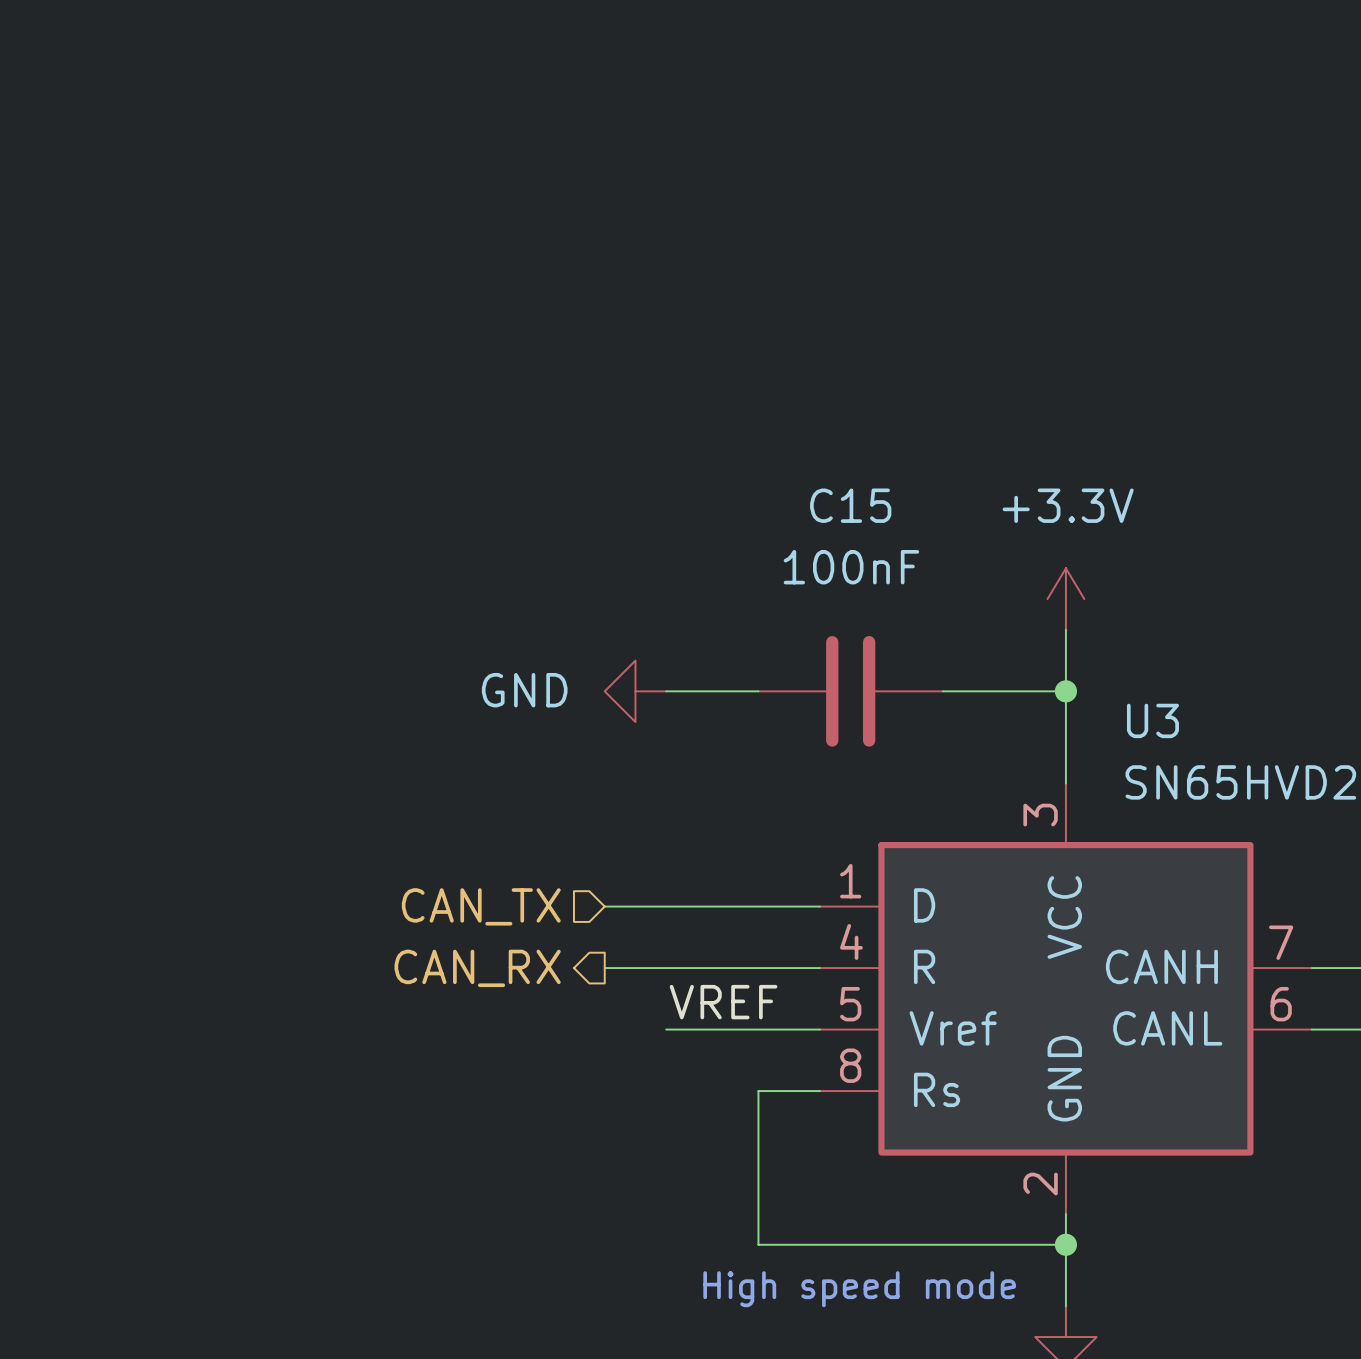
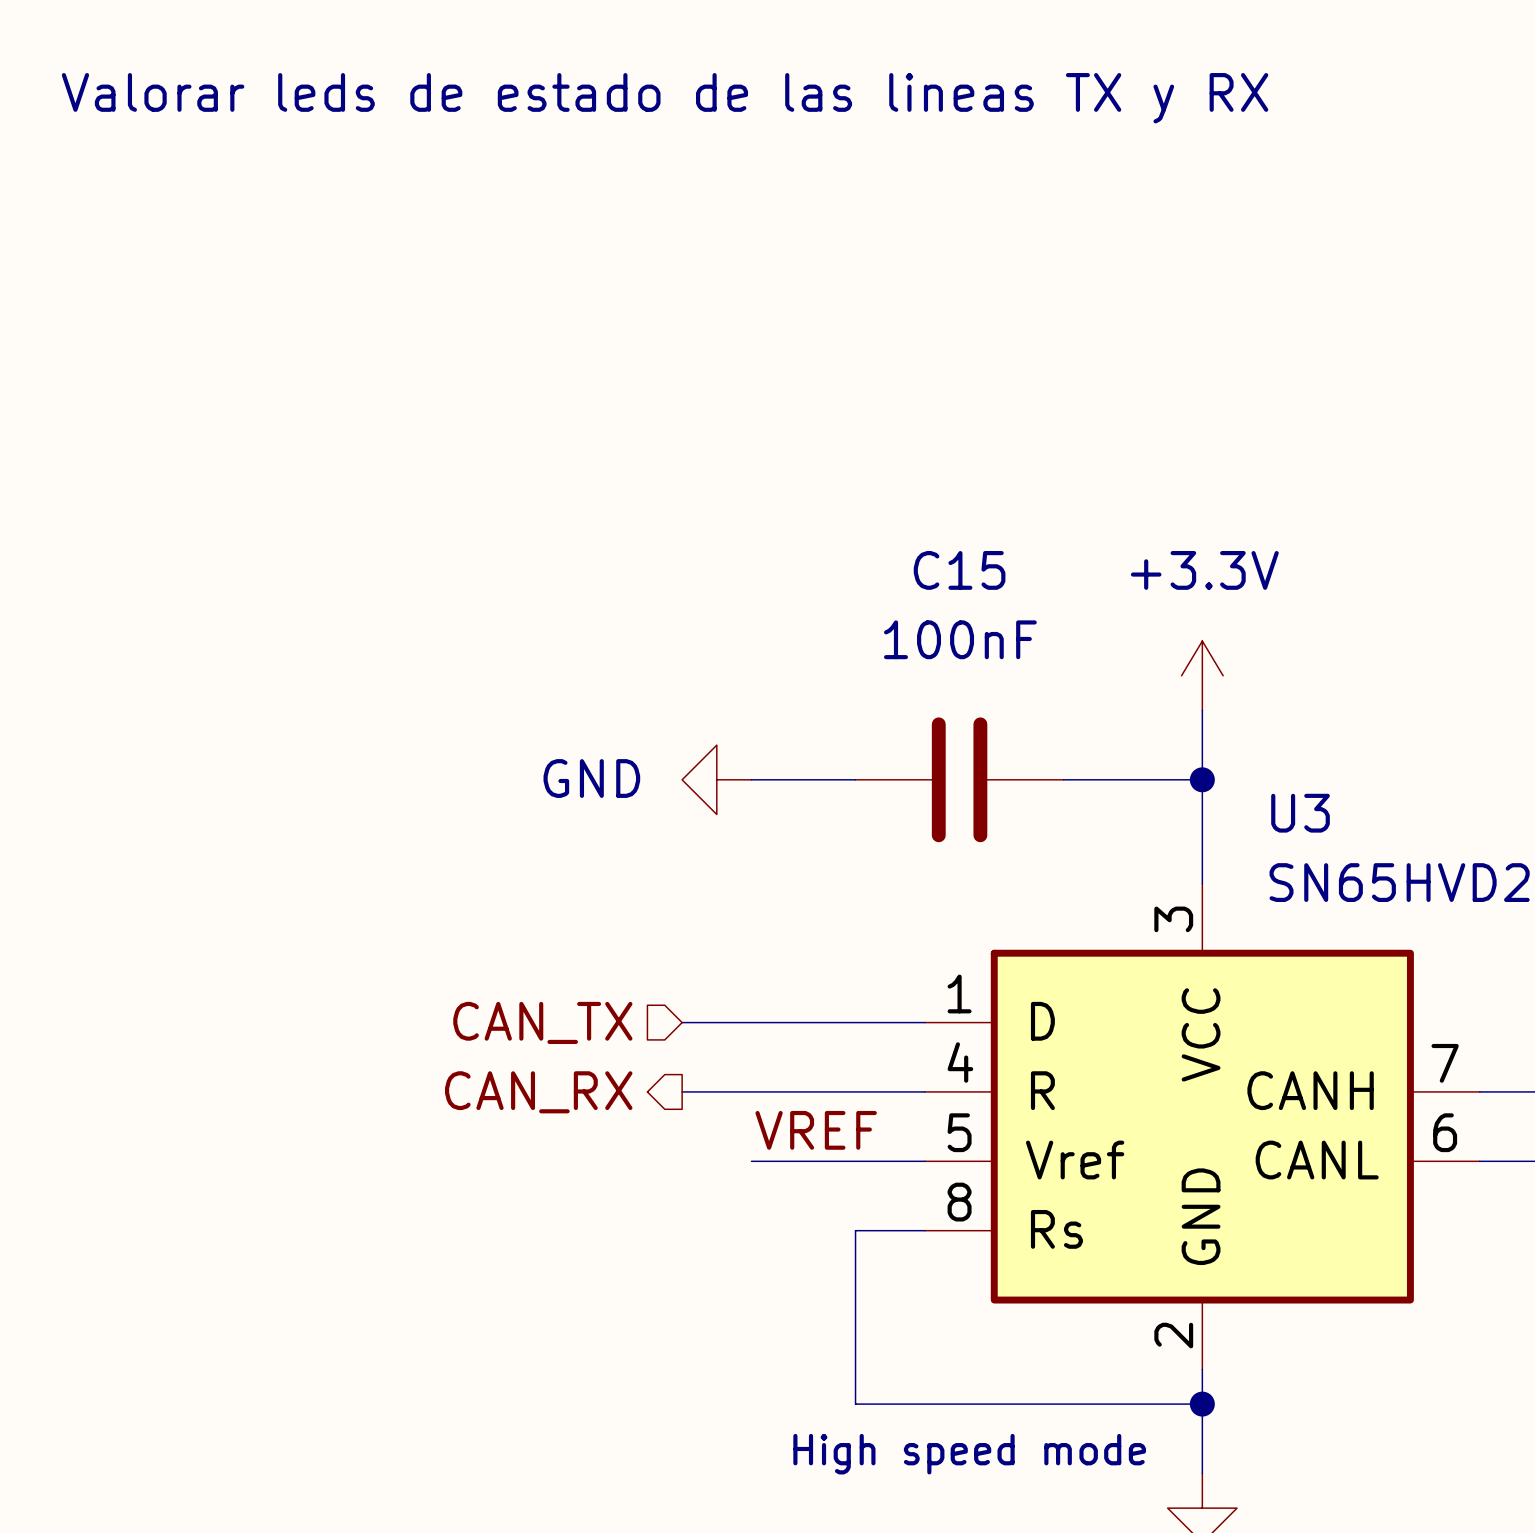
text: none -> Valorar leds de estado de las lineas TX y RX (665, 98)

